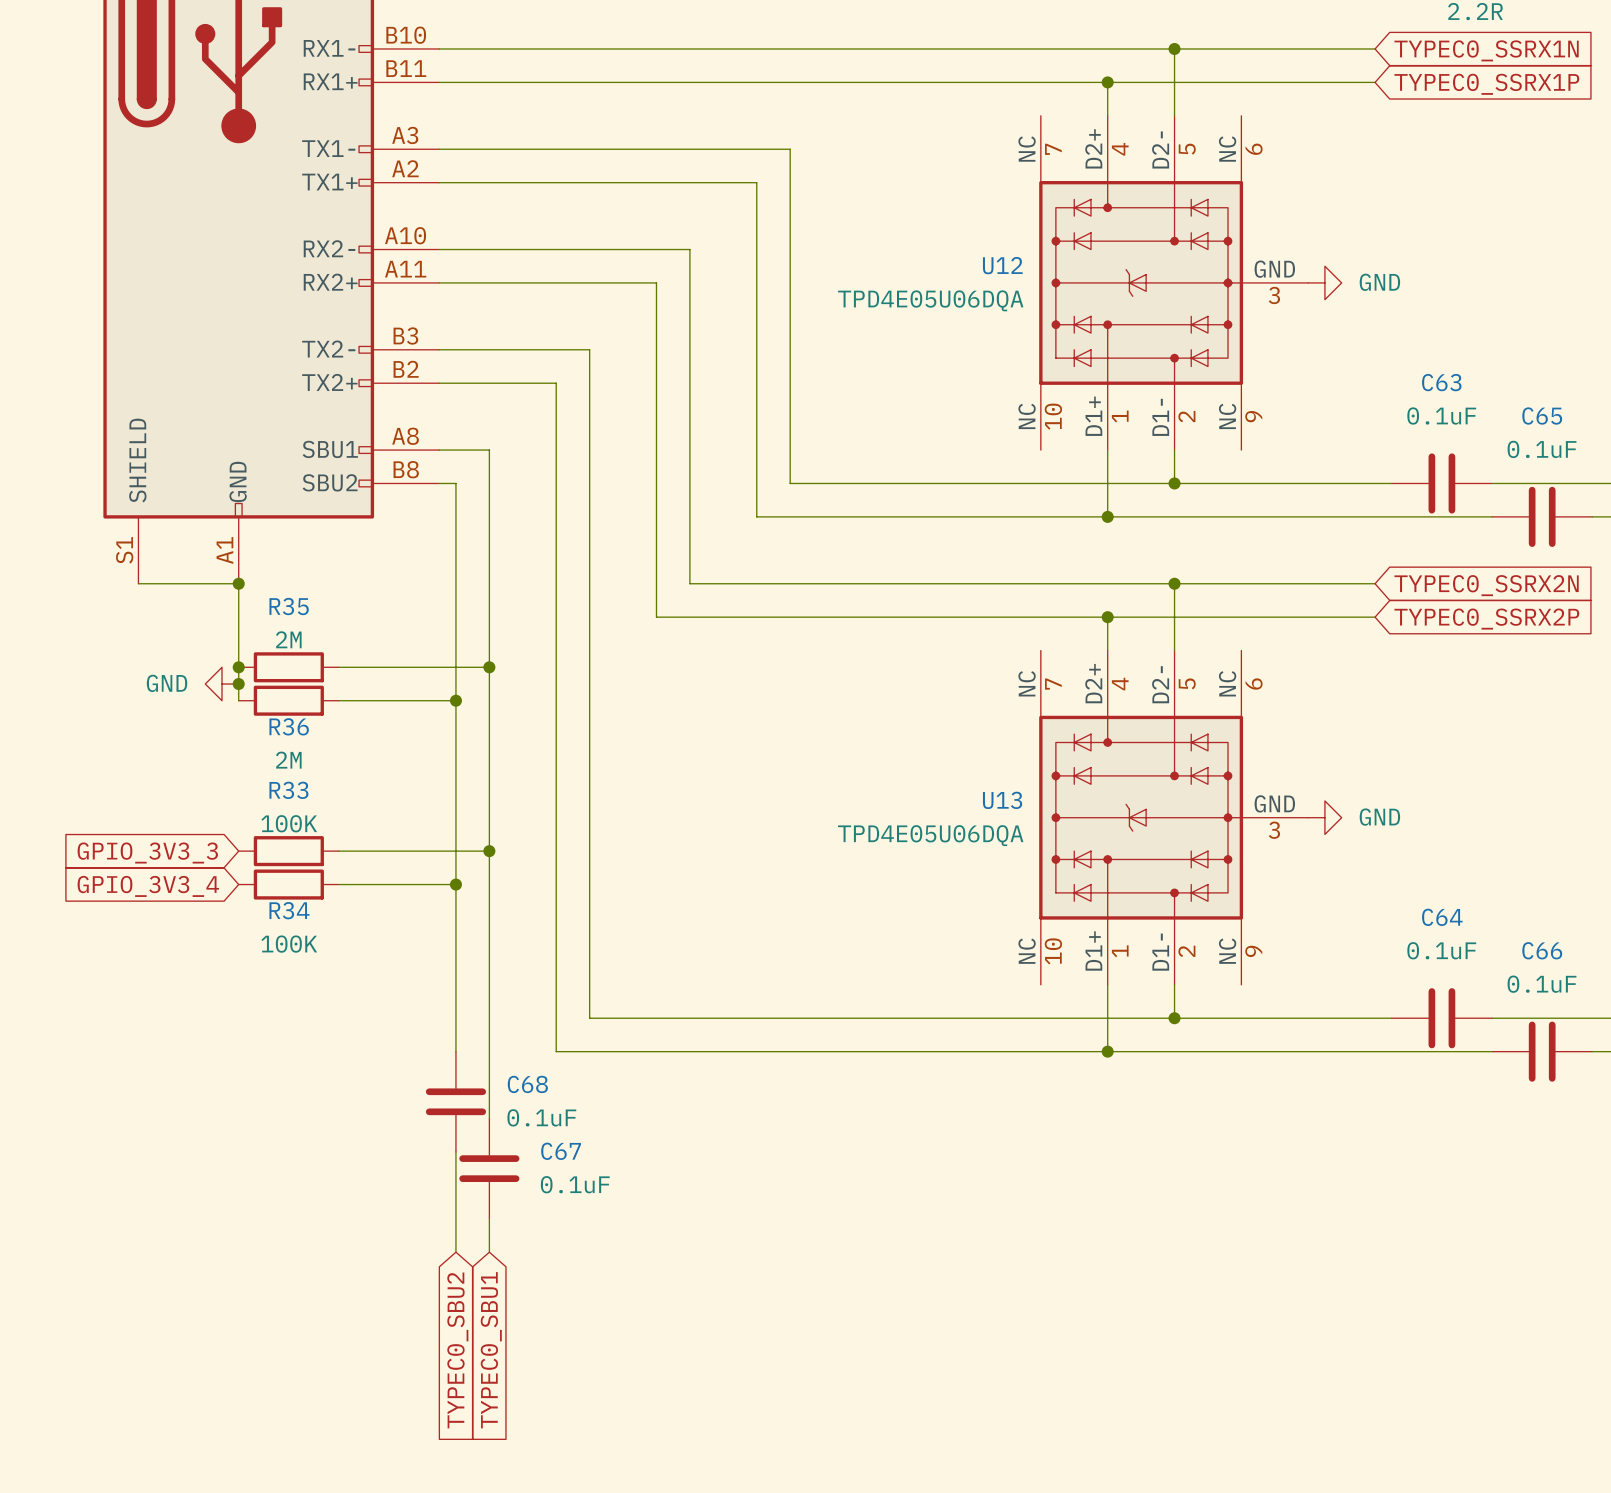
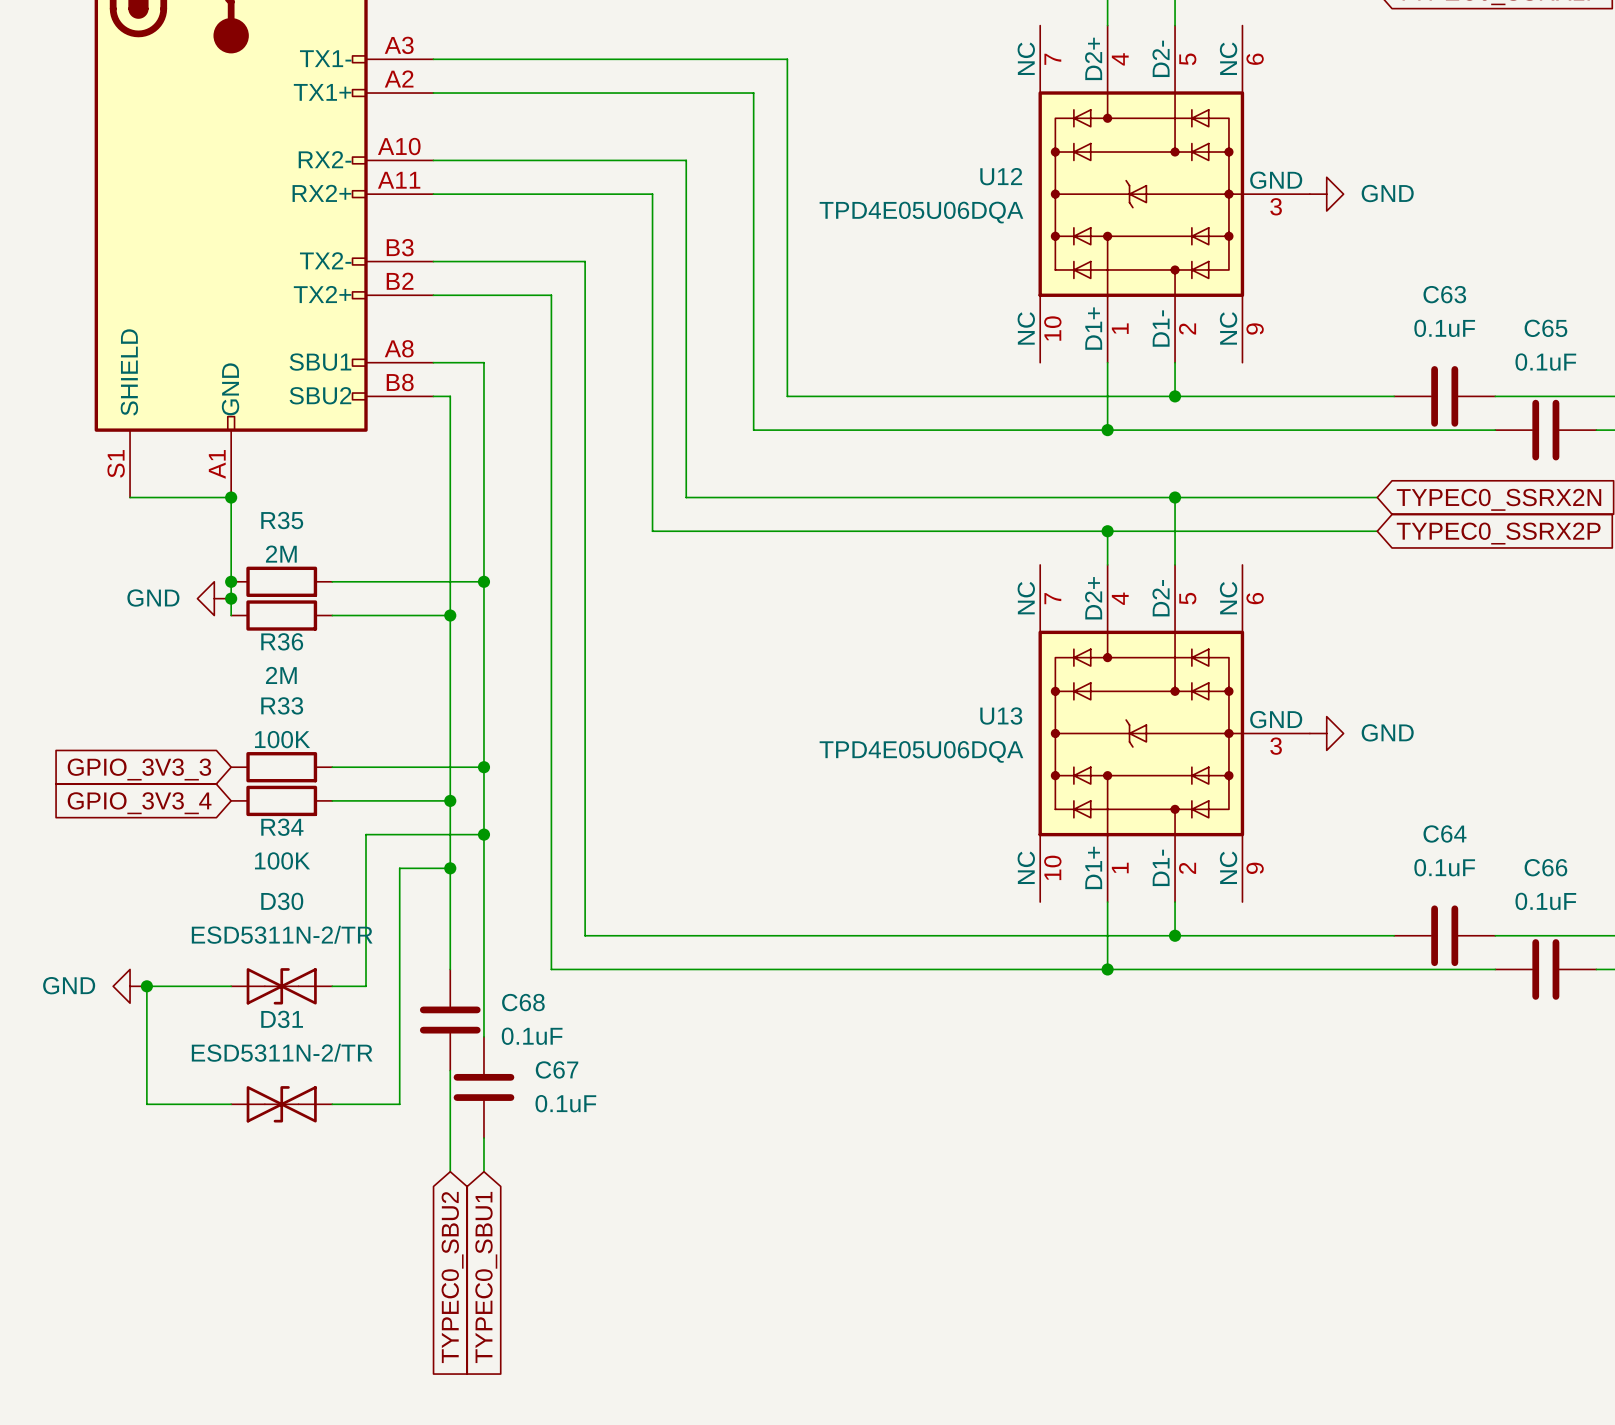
wire: none -> (483, 834) (366, 834) (366, 986) (332, 986)
junction: none -> (483, 834)
wire: none -> (450, 868) (399, 868) (399, 1104) (332, 1104)
junction: none -> (450, 868)
power symbol: none -> GND (130, 986)
junction: none -> (146, 986)
wire: none -> (231, 986) (146, 986) (146, 1104) (231, 1104)
D30: none -> ESD5311N-2/TR (281, 986)
D31: none -> ESD5311N-2/TR (281, 1104)

